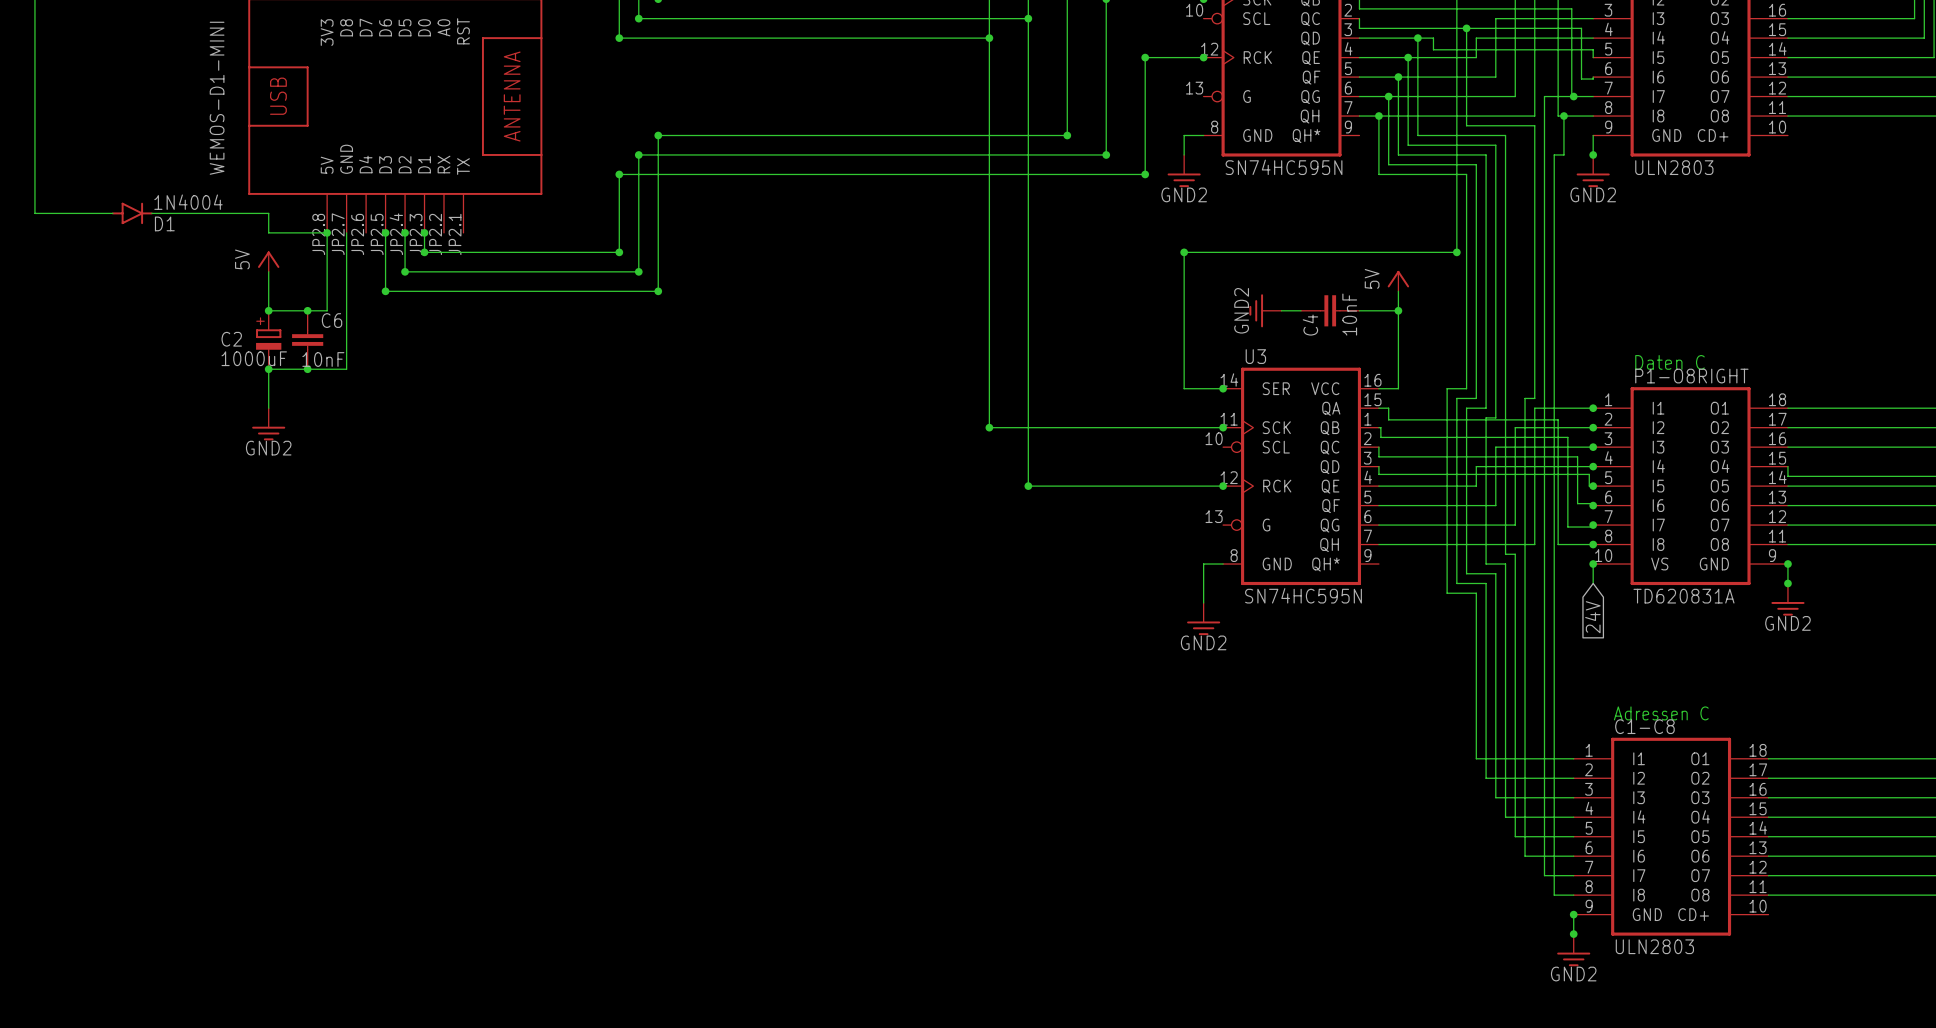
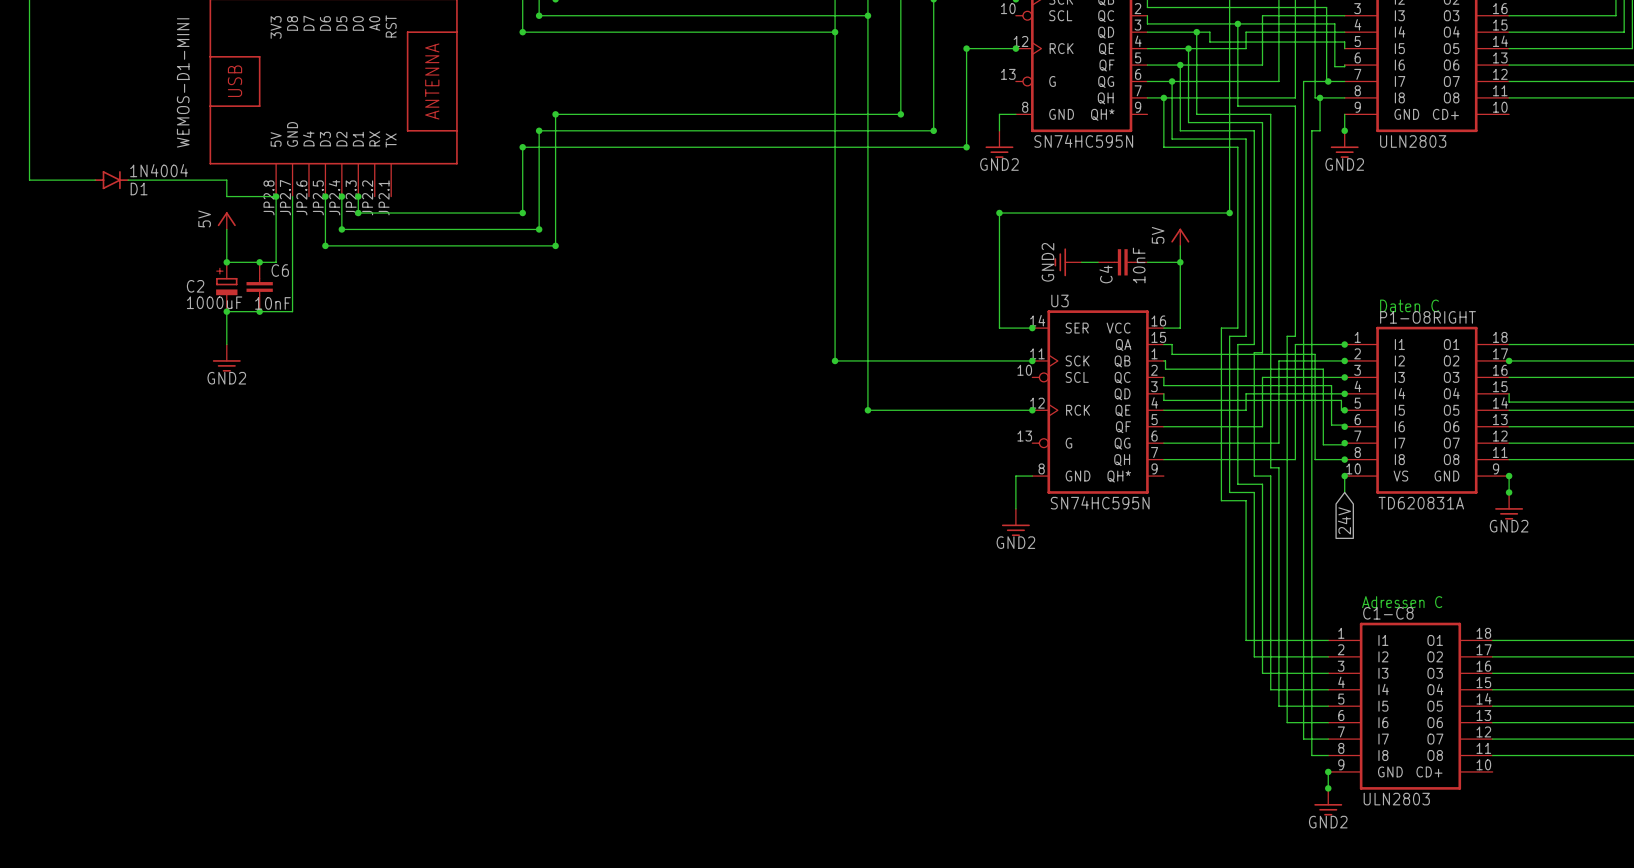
junction: none -> (1509, 360)

